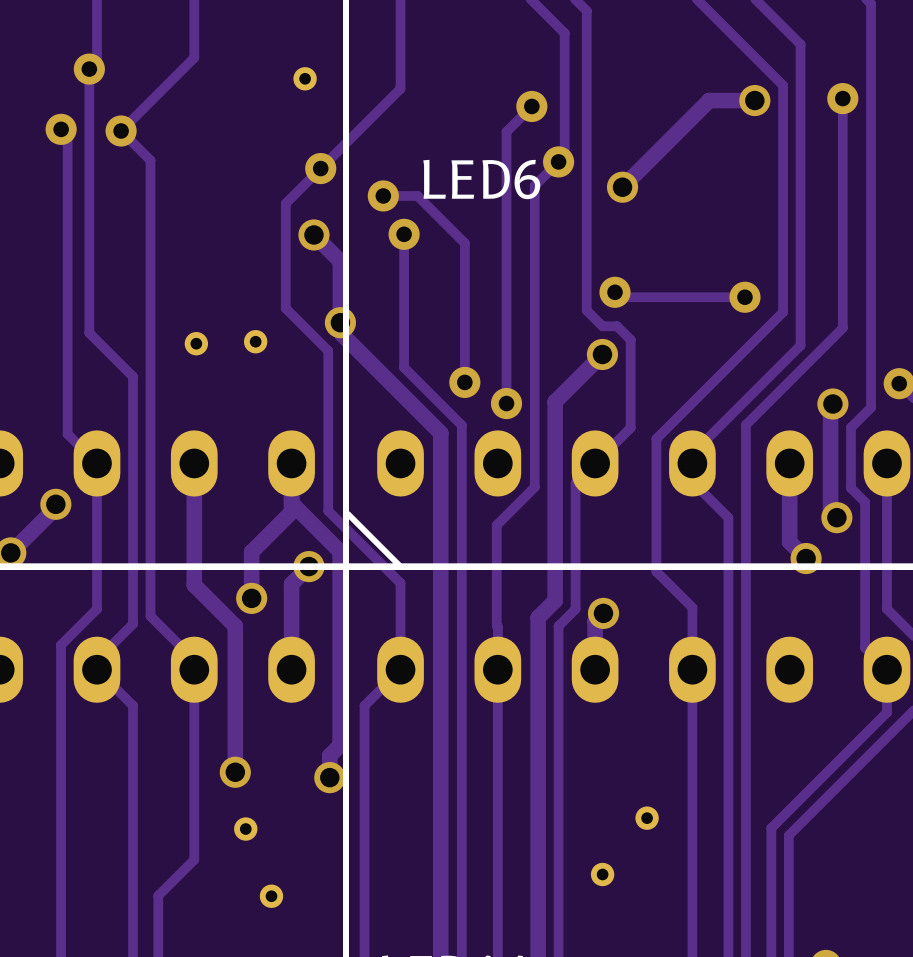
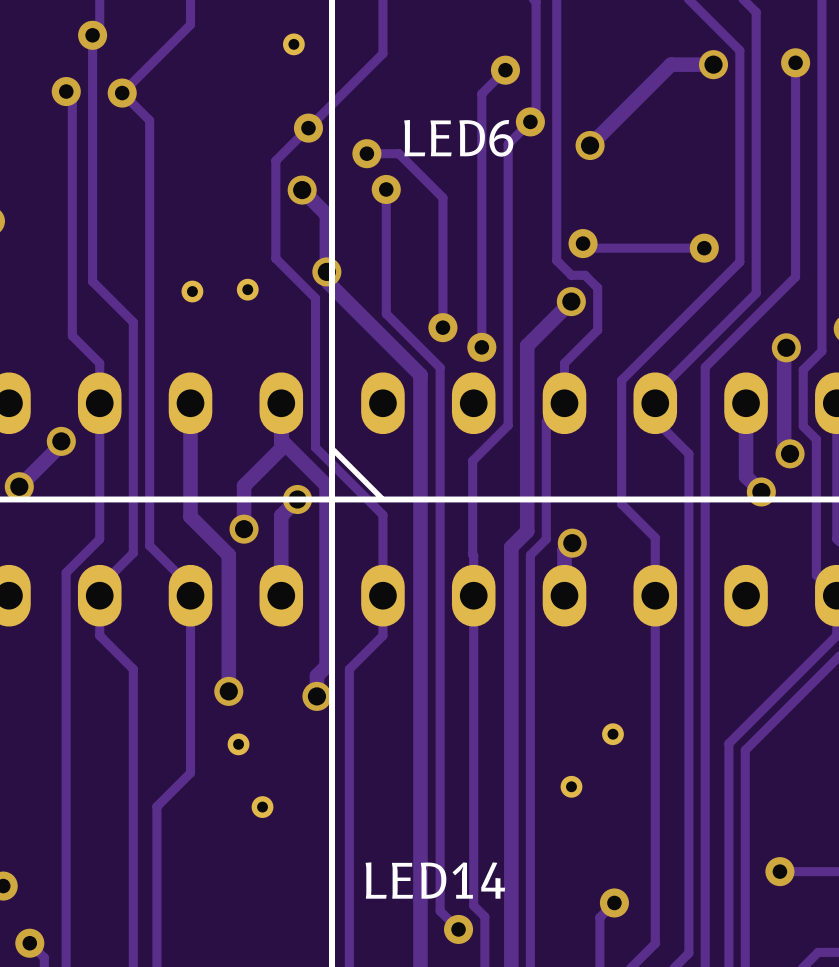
track: (630, 385) (630, 427) (595, 463) -> (597, 330) (564, 363) (564, 403)
track: (67, 391) (67, 434) (97, 463) -> (72, 335) (99, 363) (99, 403)
track: (97, 669) (133, 705) (133, 748) -> (99, 595) (99, 635) (133, 669)
track: (400, 669) (364, 705) (364, 748) -> (382, 595) (382, 635) (349, 669)

